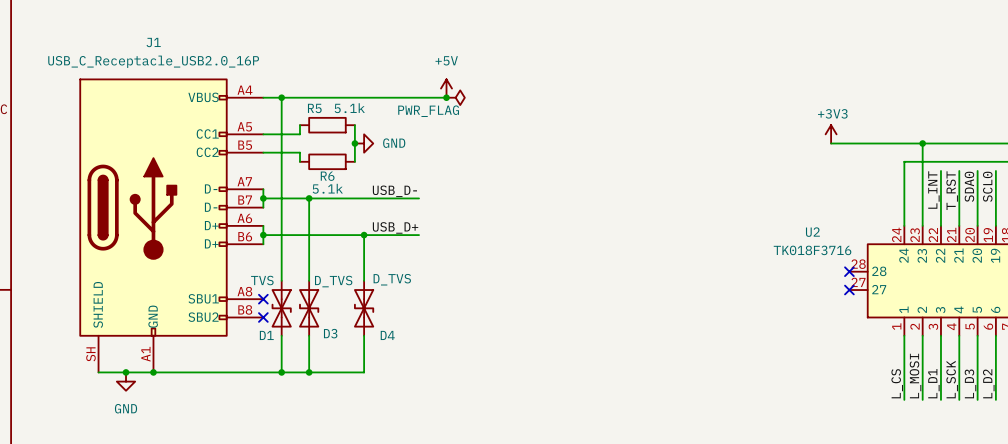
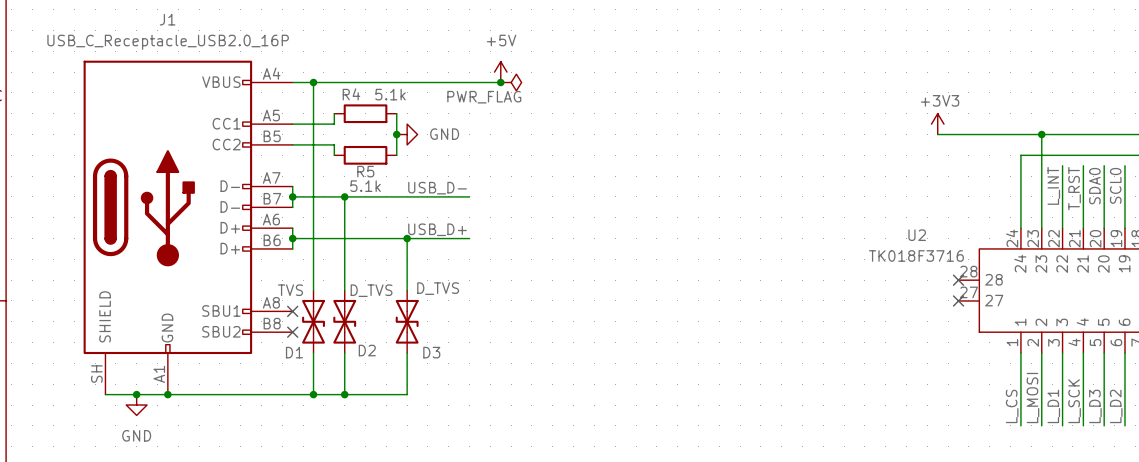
R5 name: R5 (314, 108) -> R4 (351, 94)
R6 name: R6 (327, 176) -> R5 (365, 171)
D3 name: D3 (330, 333) -> D2 (367, 350)
D4 name: D4 (387, 335) -> D3 (431, 352)

